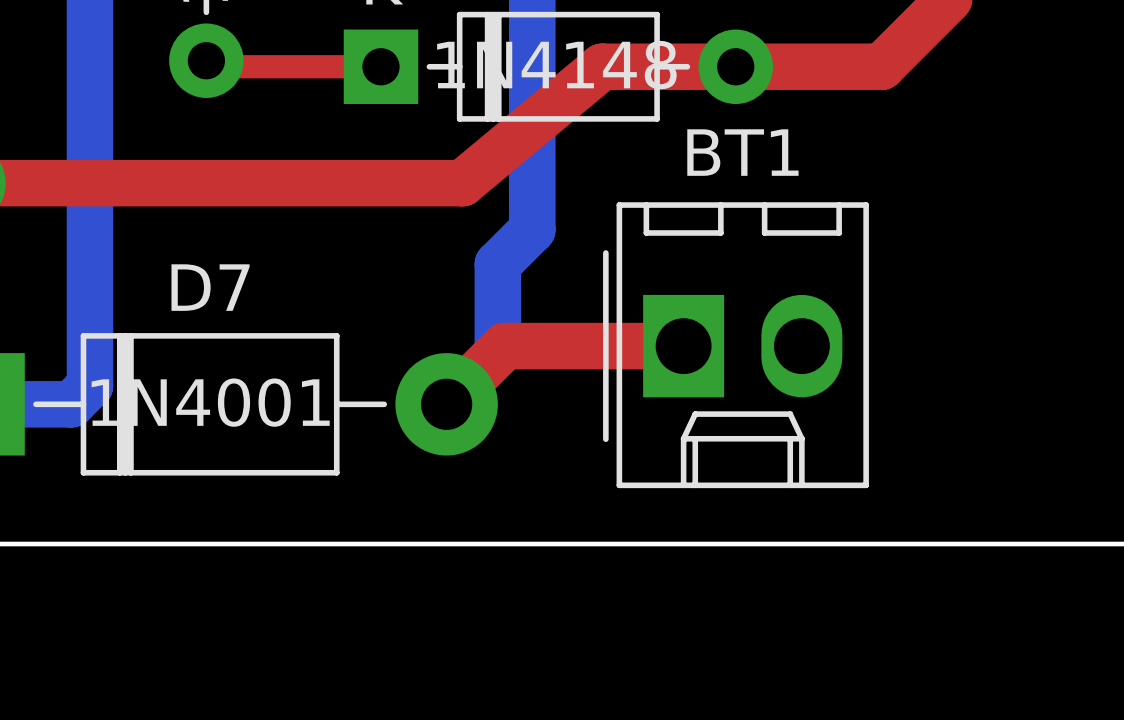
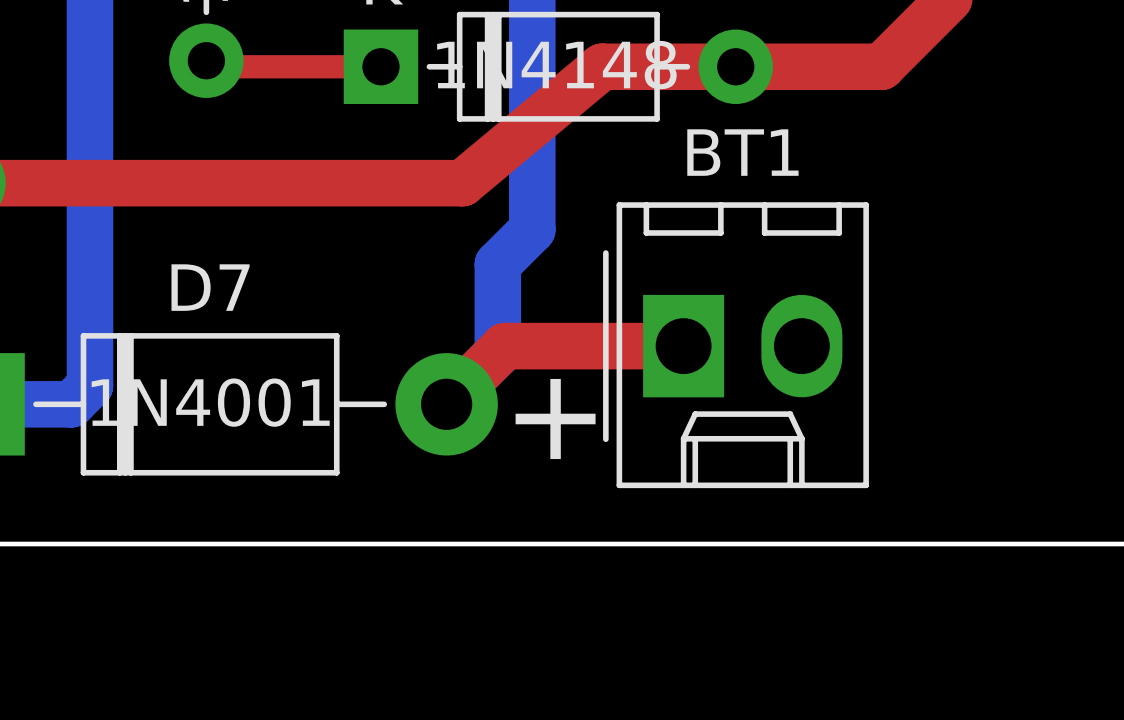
text: none -> + (555, 418)

